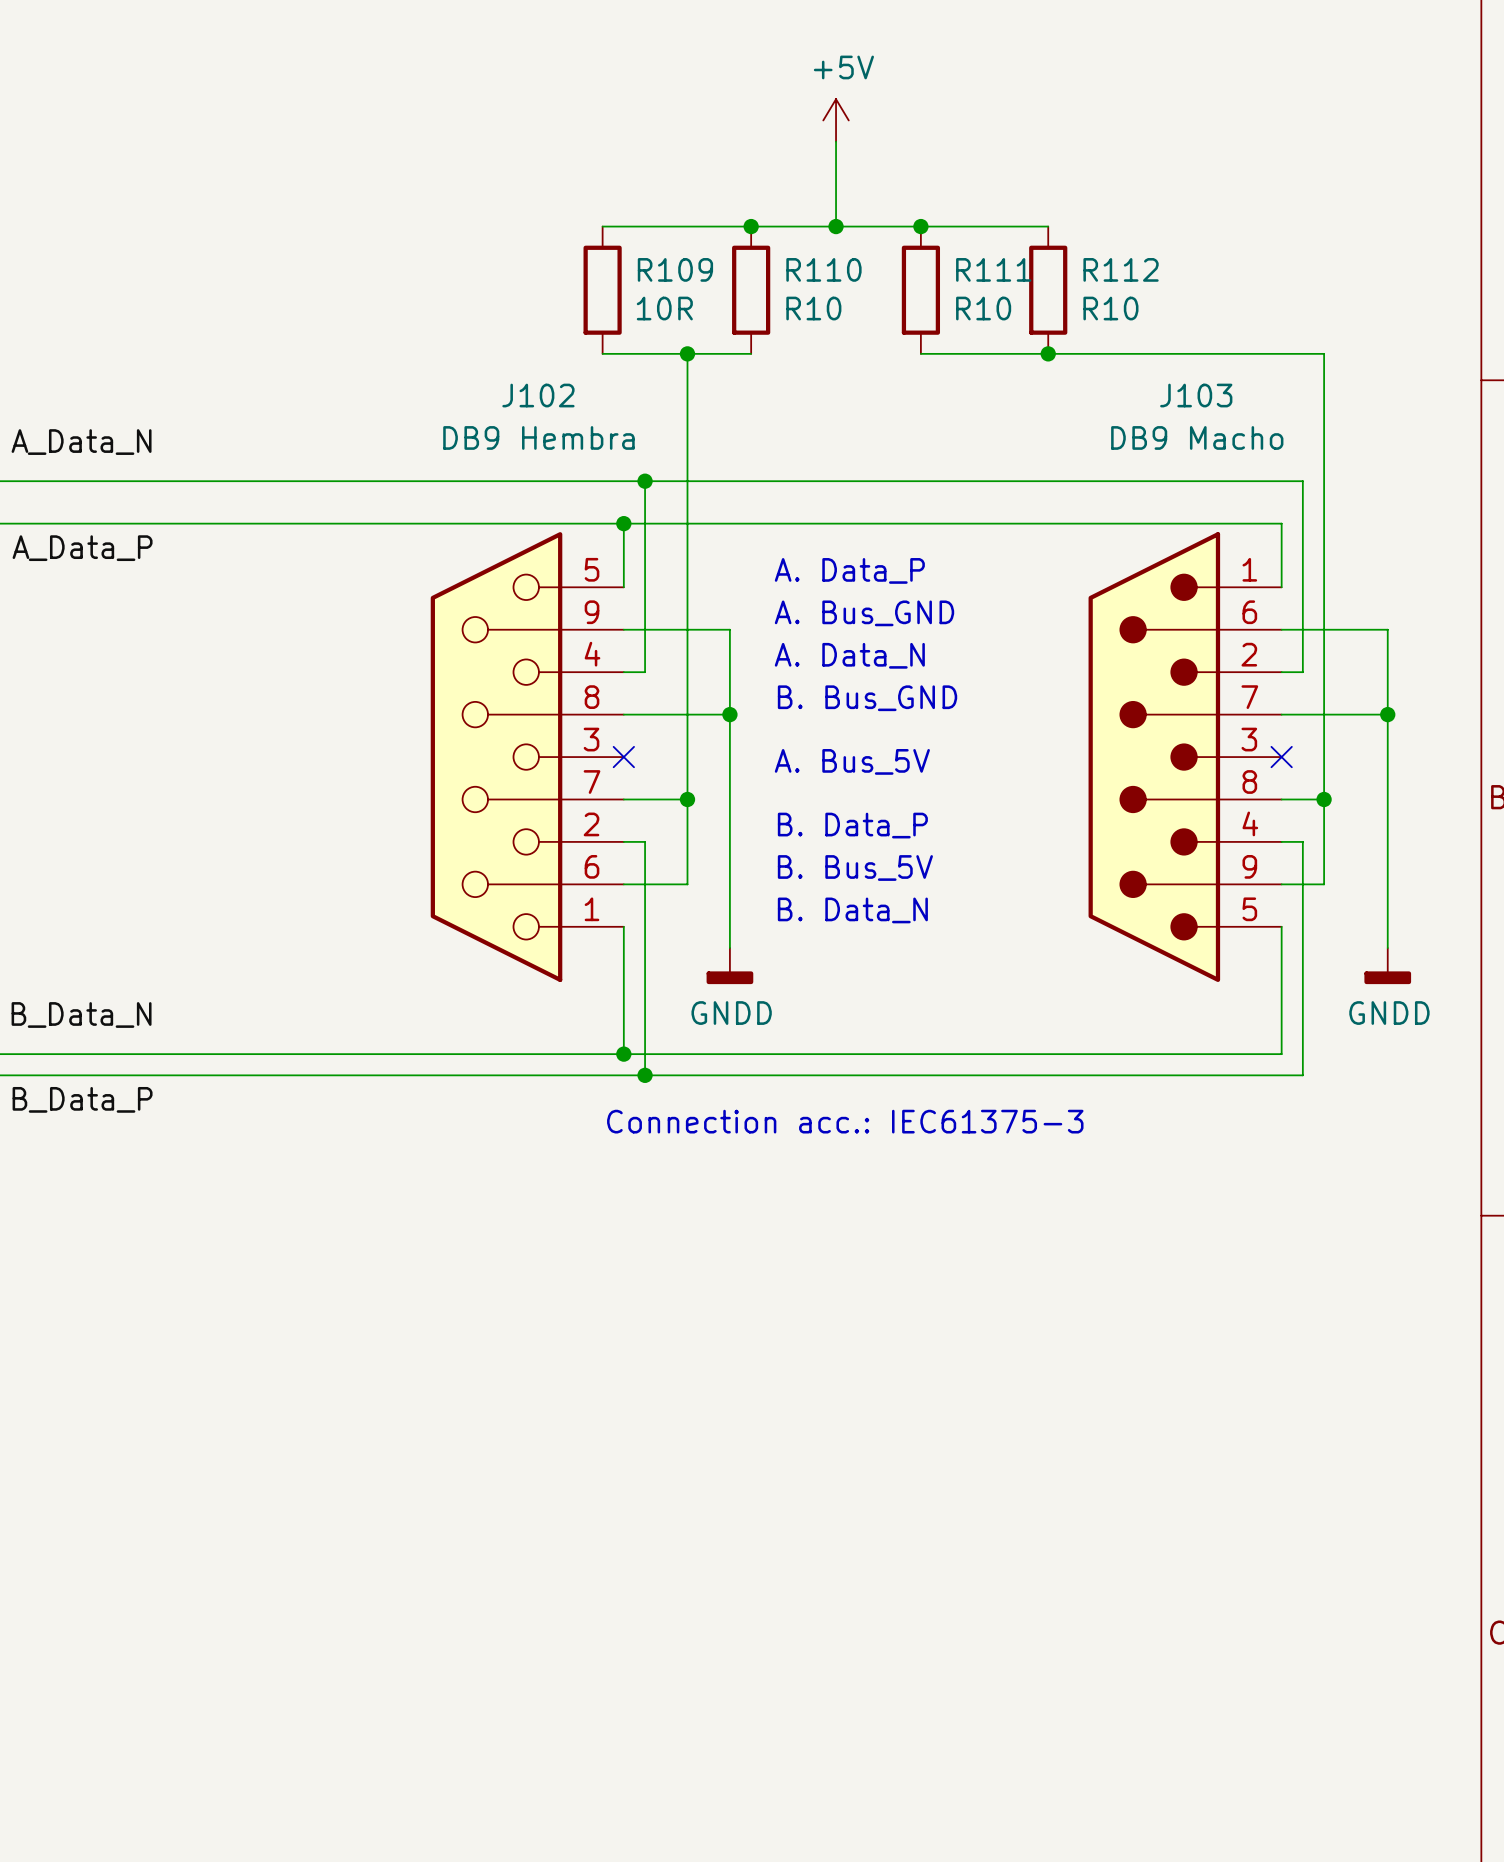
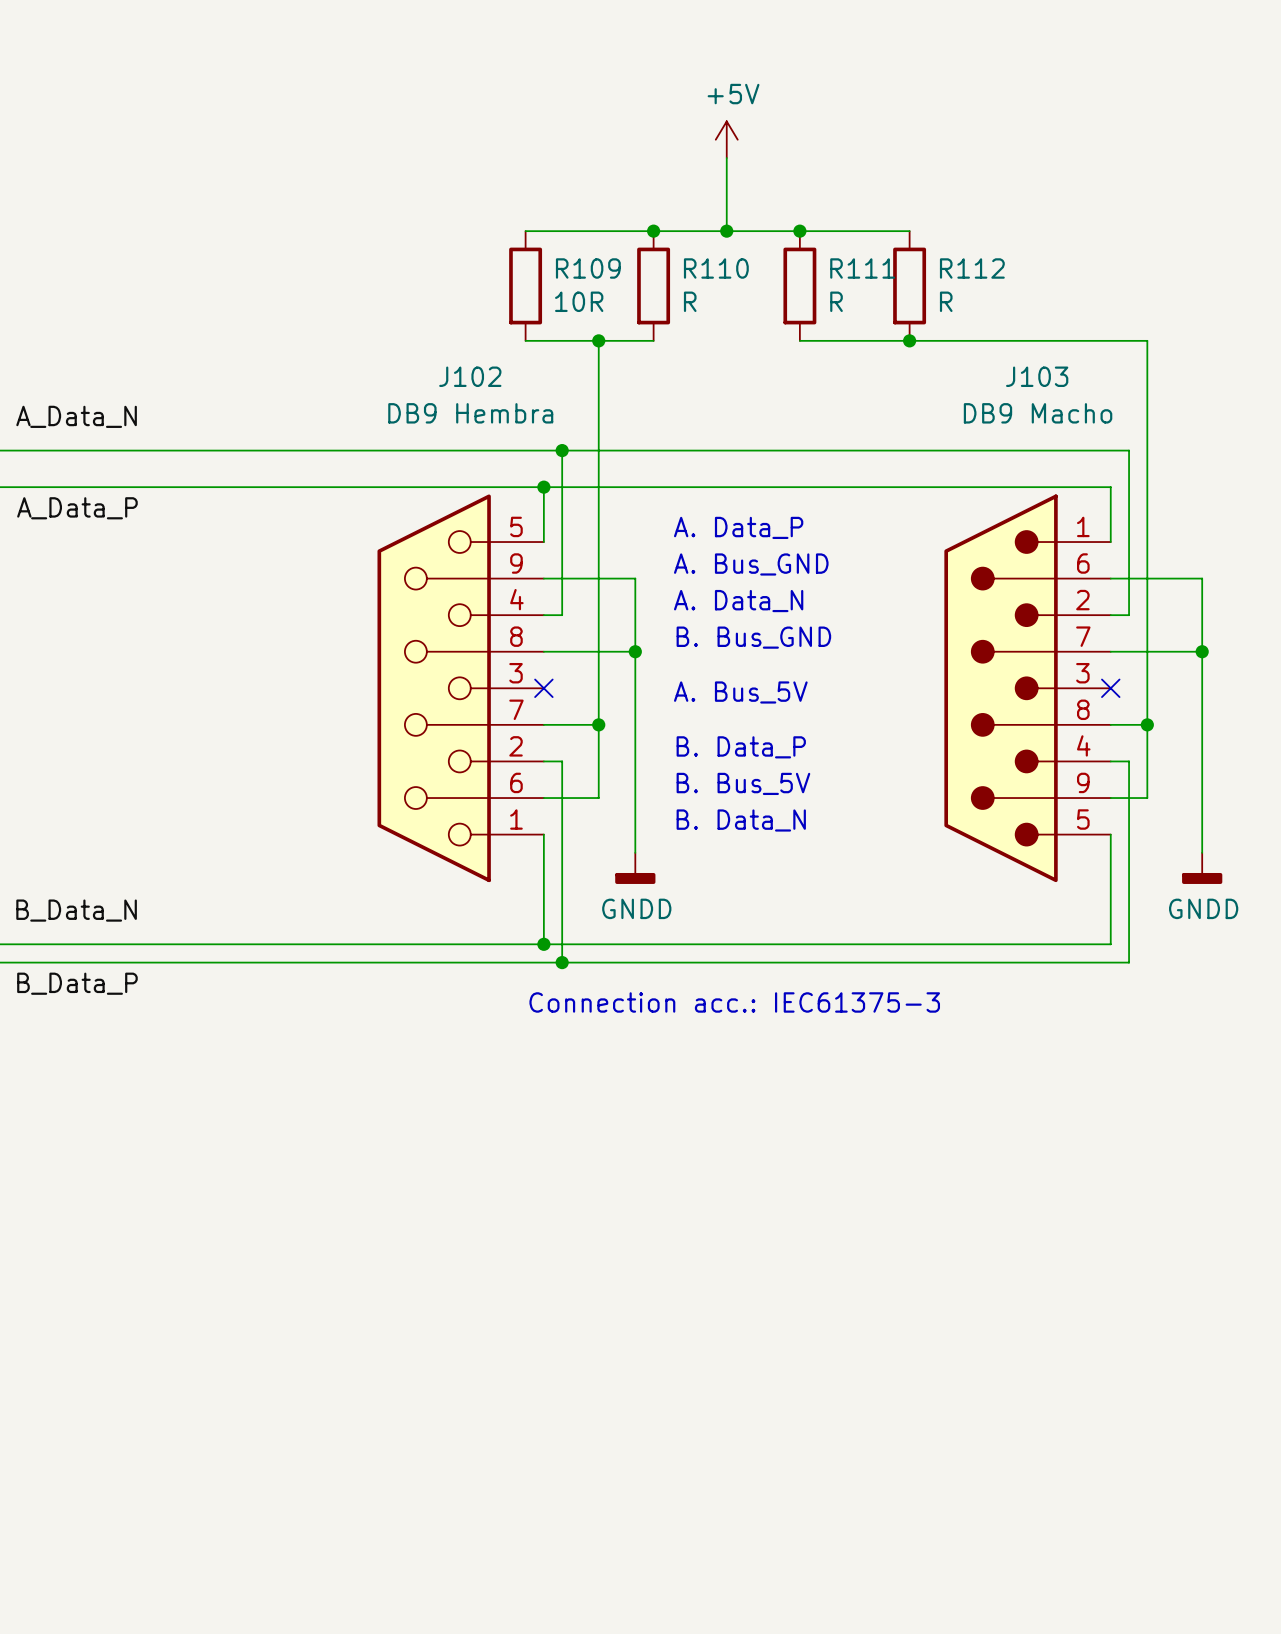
R110 value: R10 (813, 308) -> R (690, 301)
R111 value: R10 (983, 308) -> R (836, 301)
R112 value: R10 (1110, 308) -> R (946, 301)

